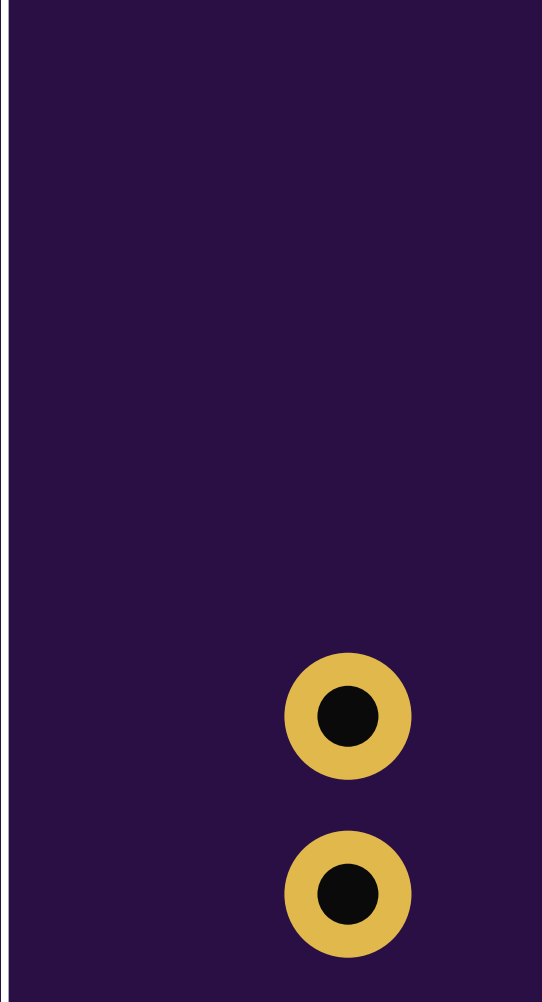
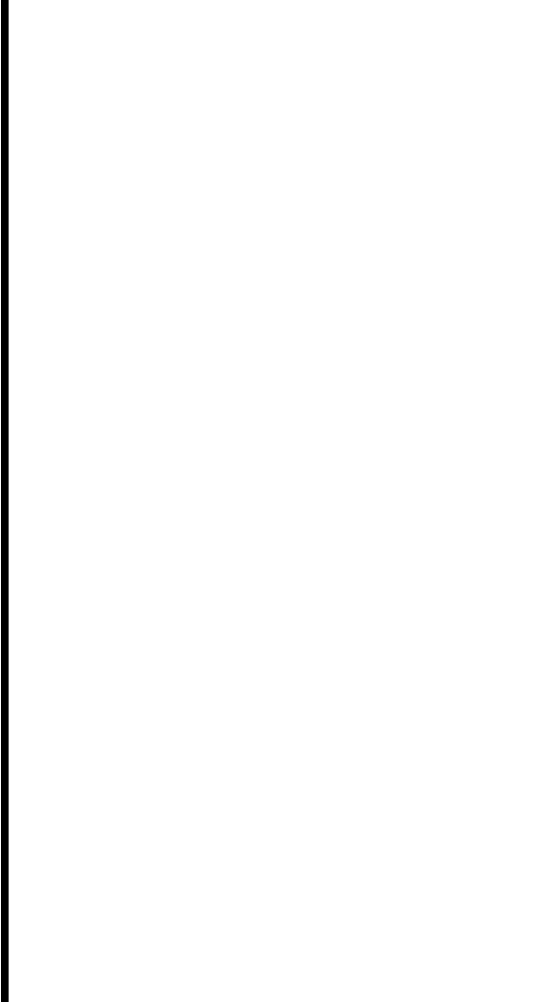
part: (347, 716) -> none
part: (347, 894) -> none

